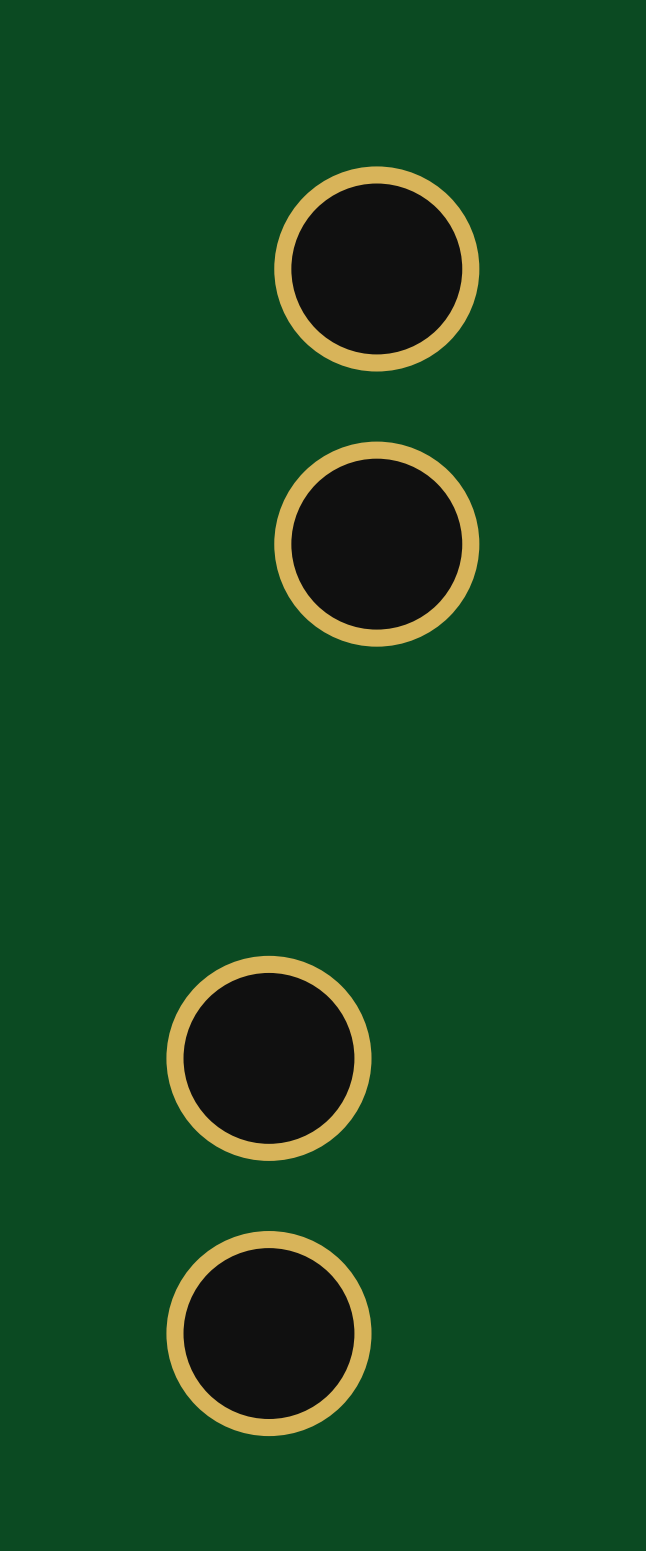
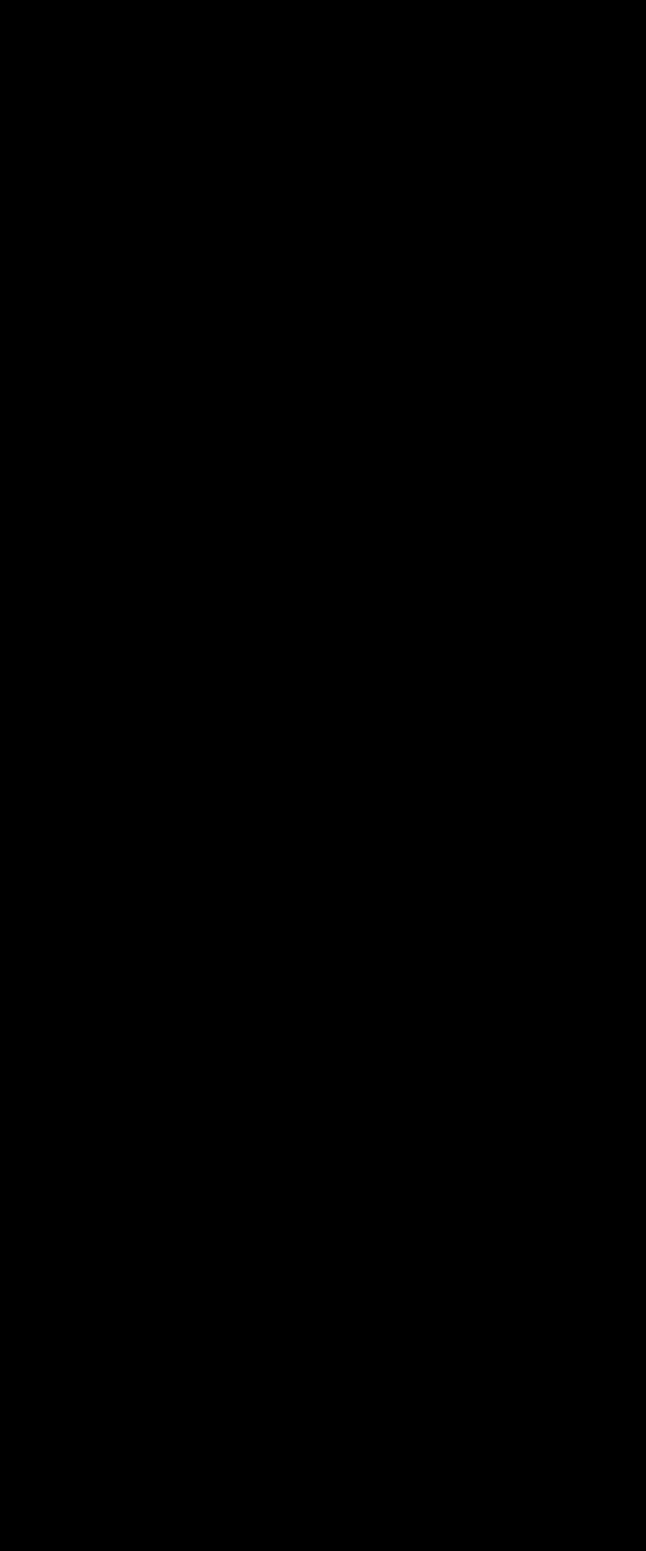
part: (376, 268) -> none
part: (376, 544) -> none
part: (268, 1058) -> none
part: (268, 1333) -> none

